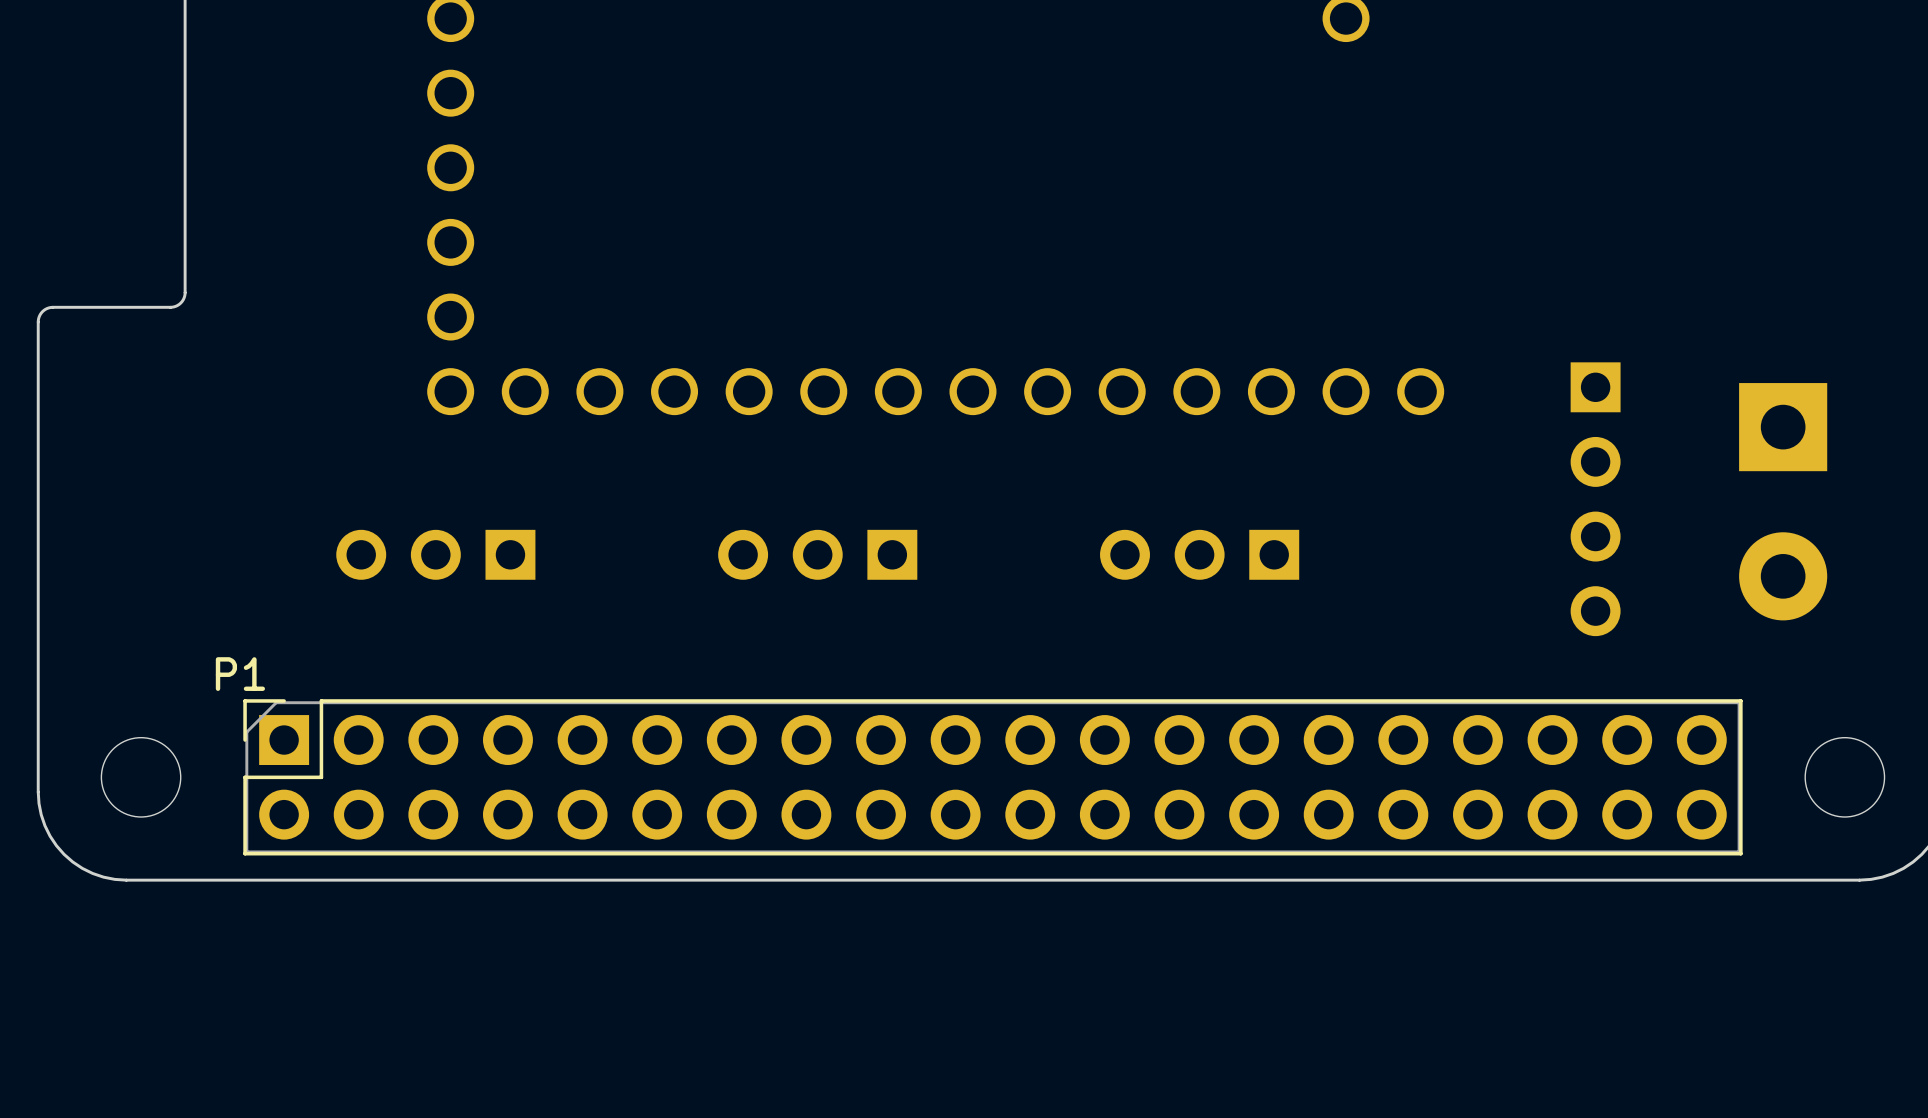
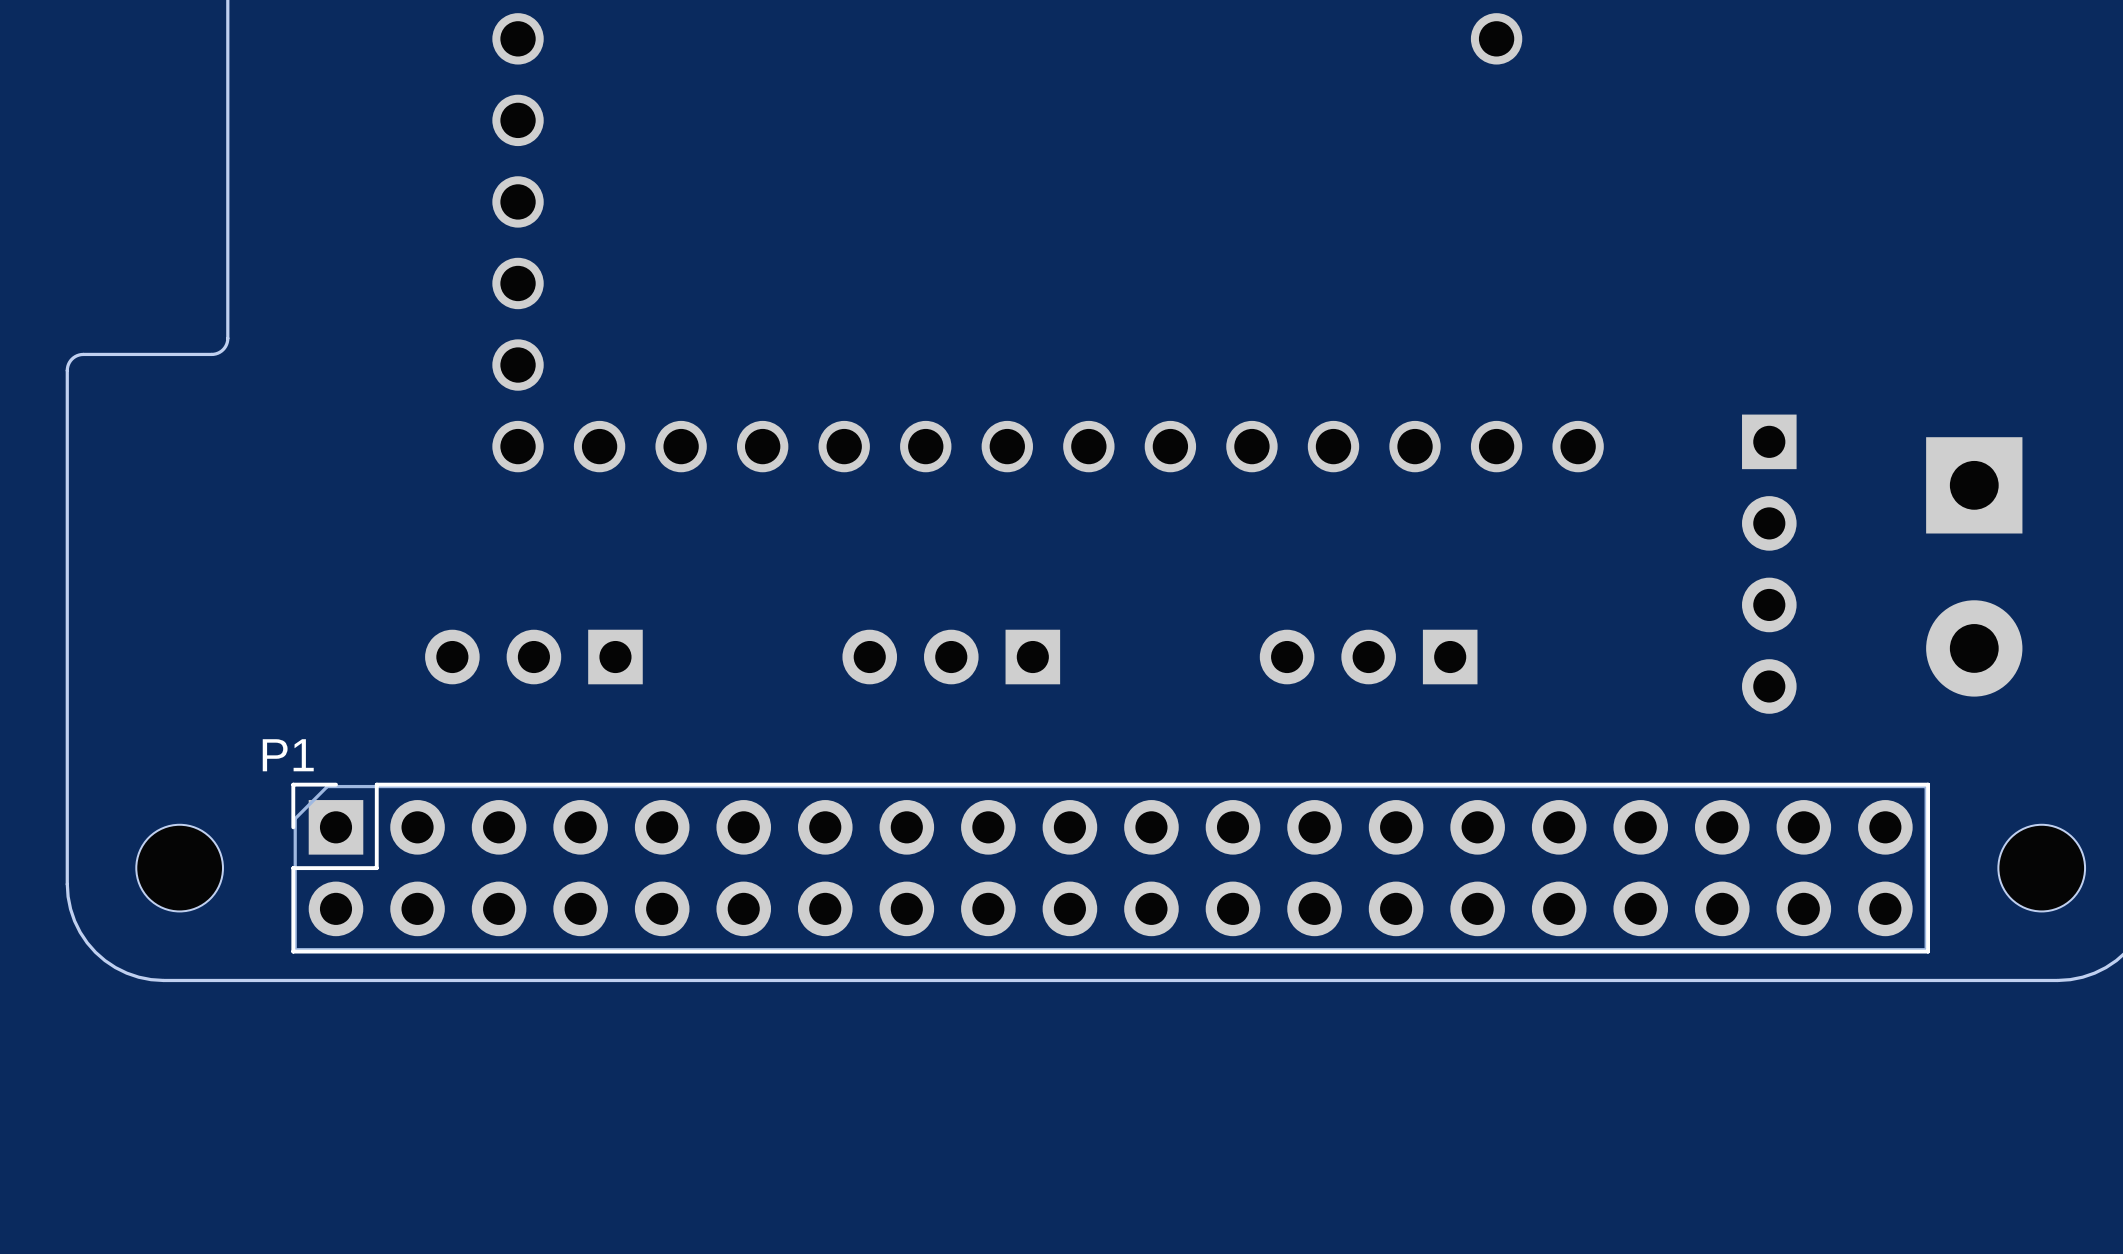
part position: (435, 554) -> (533, 657)
part position: (817, 554) -> (951, 657)
part position: (1199, 554) -> (1368, 657)

